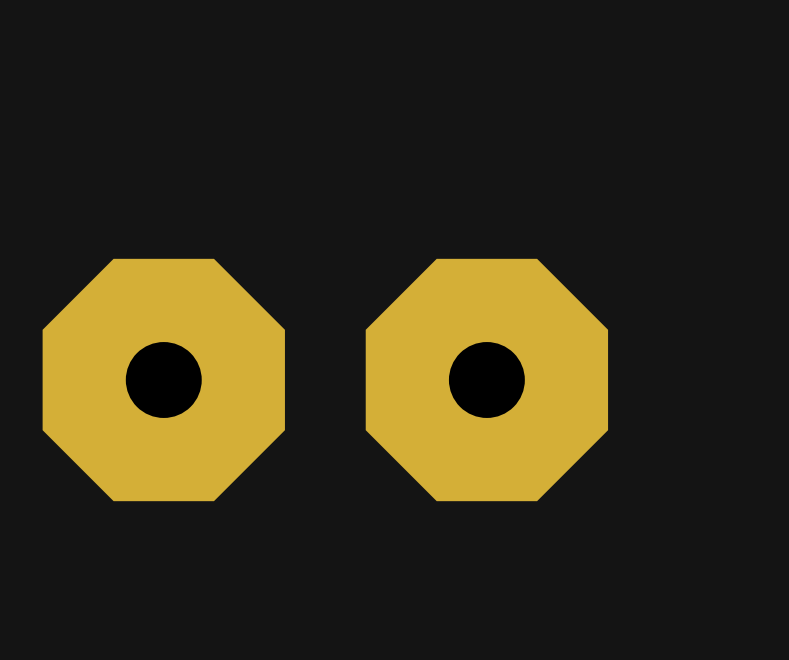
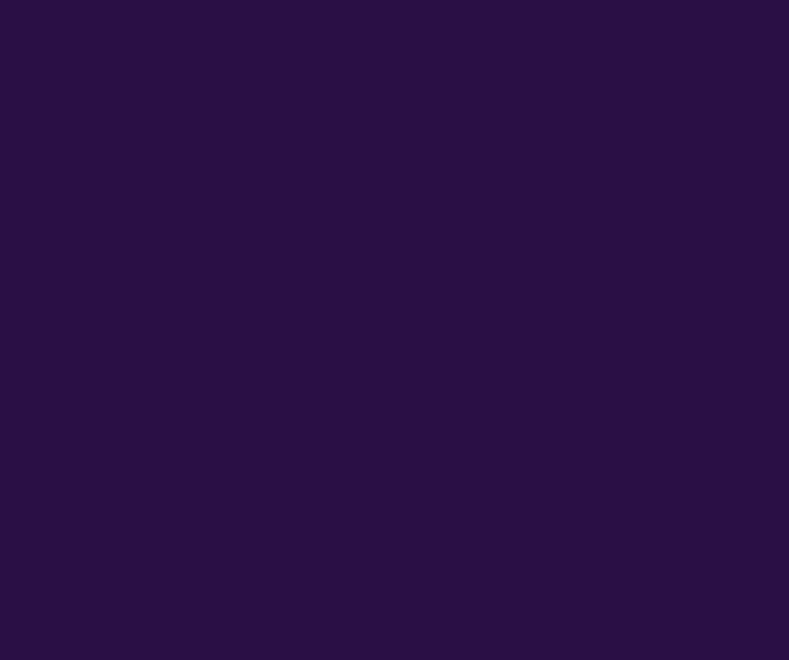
part: (325, 380) -> none

